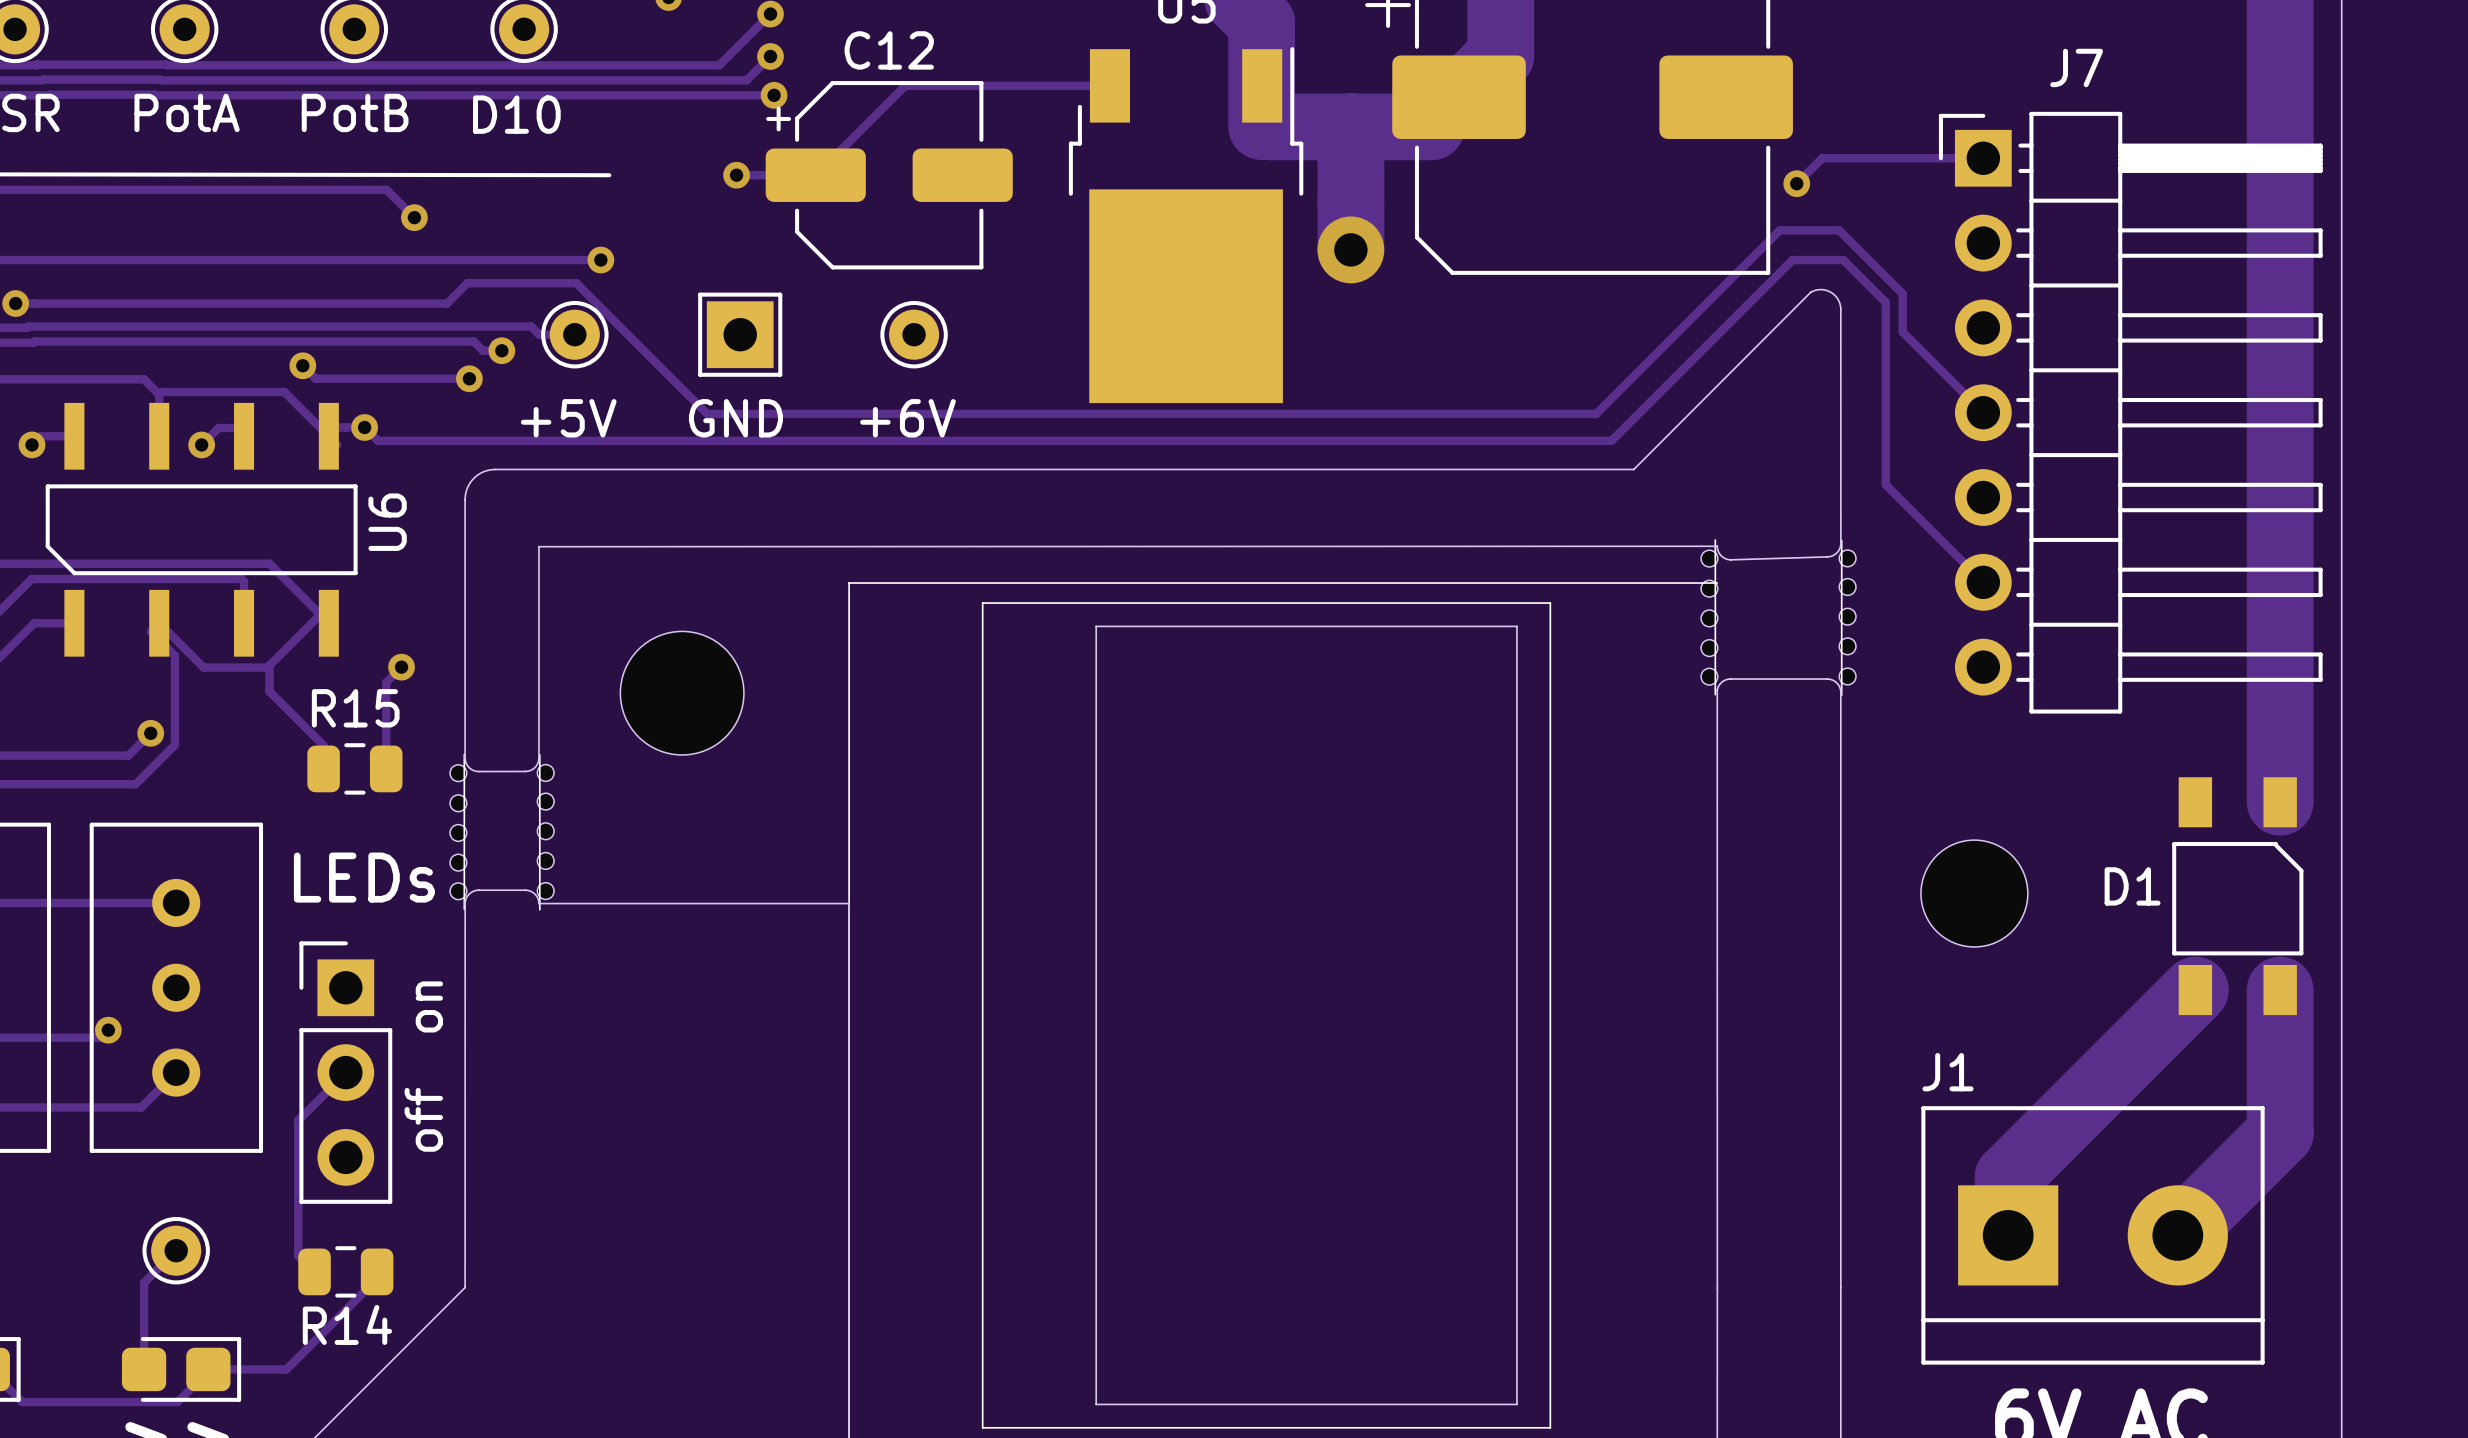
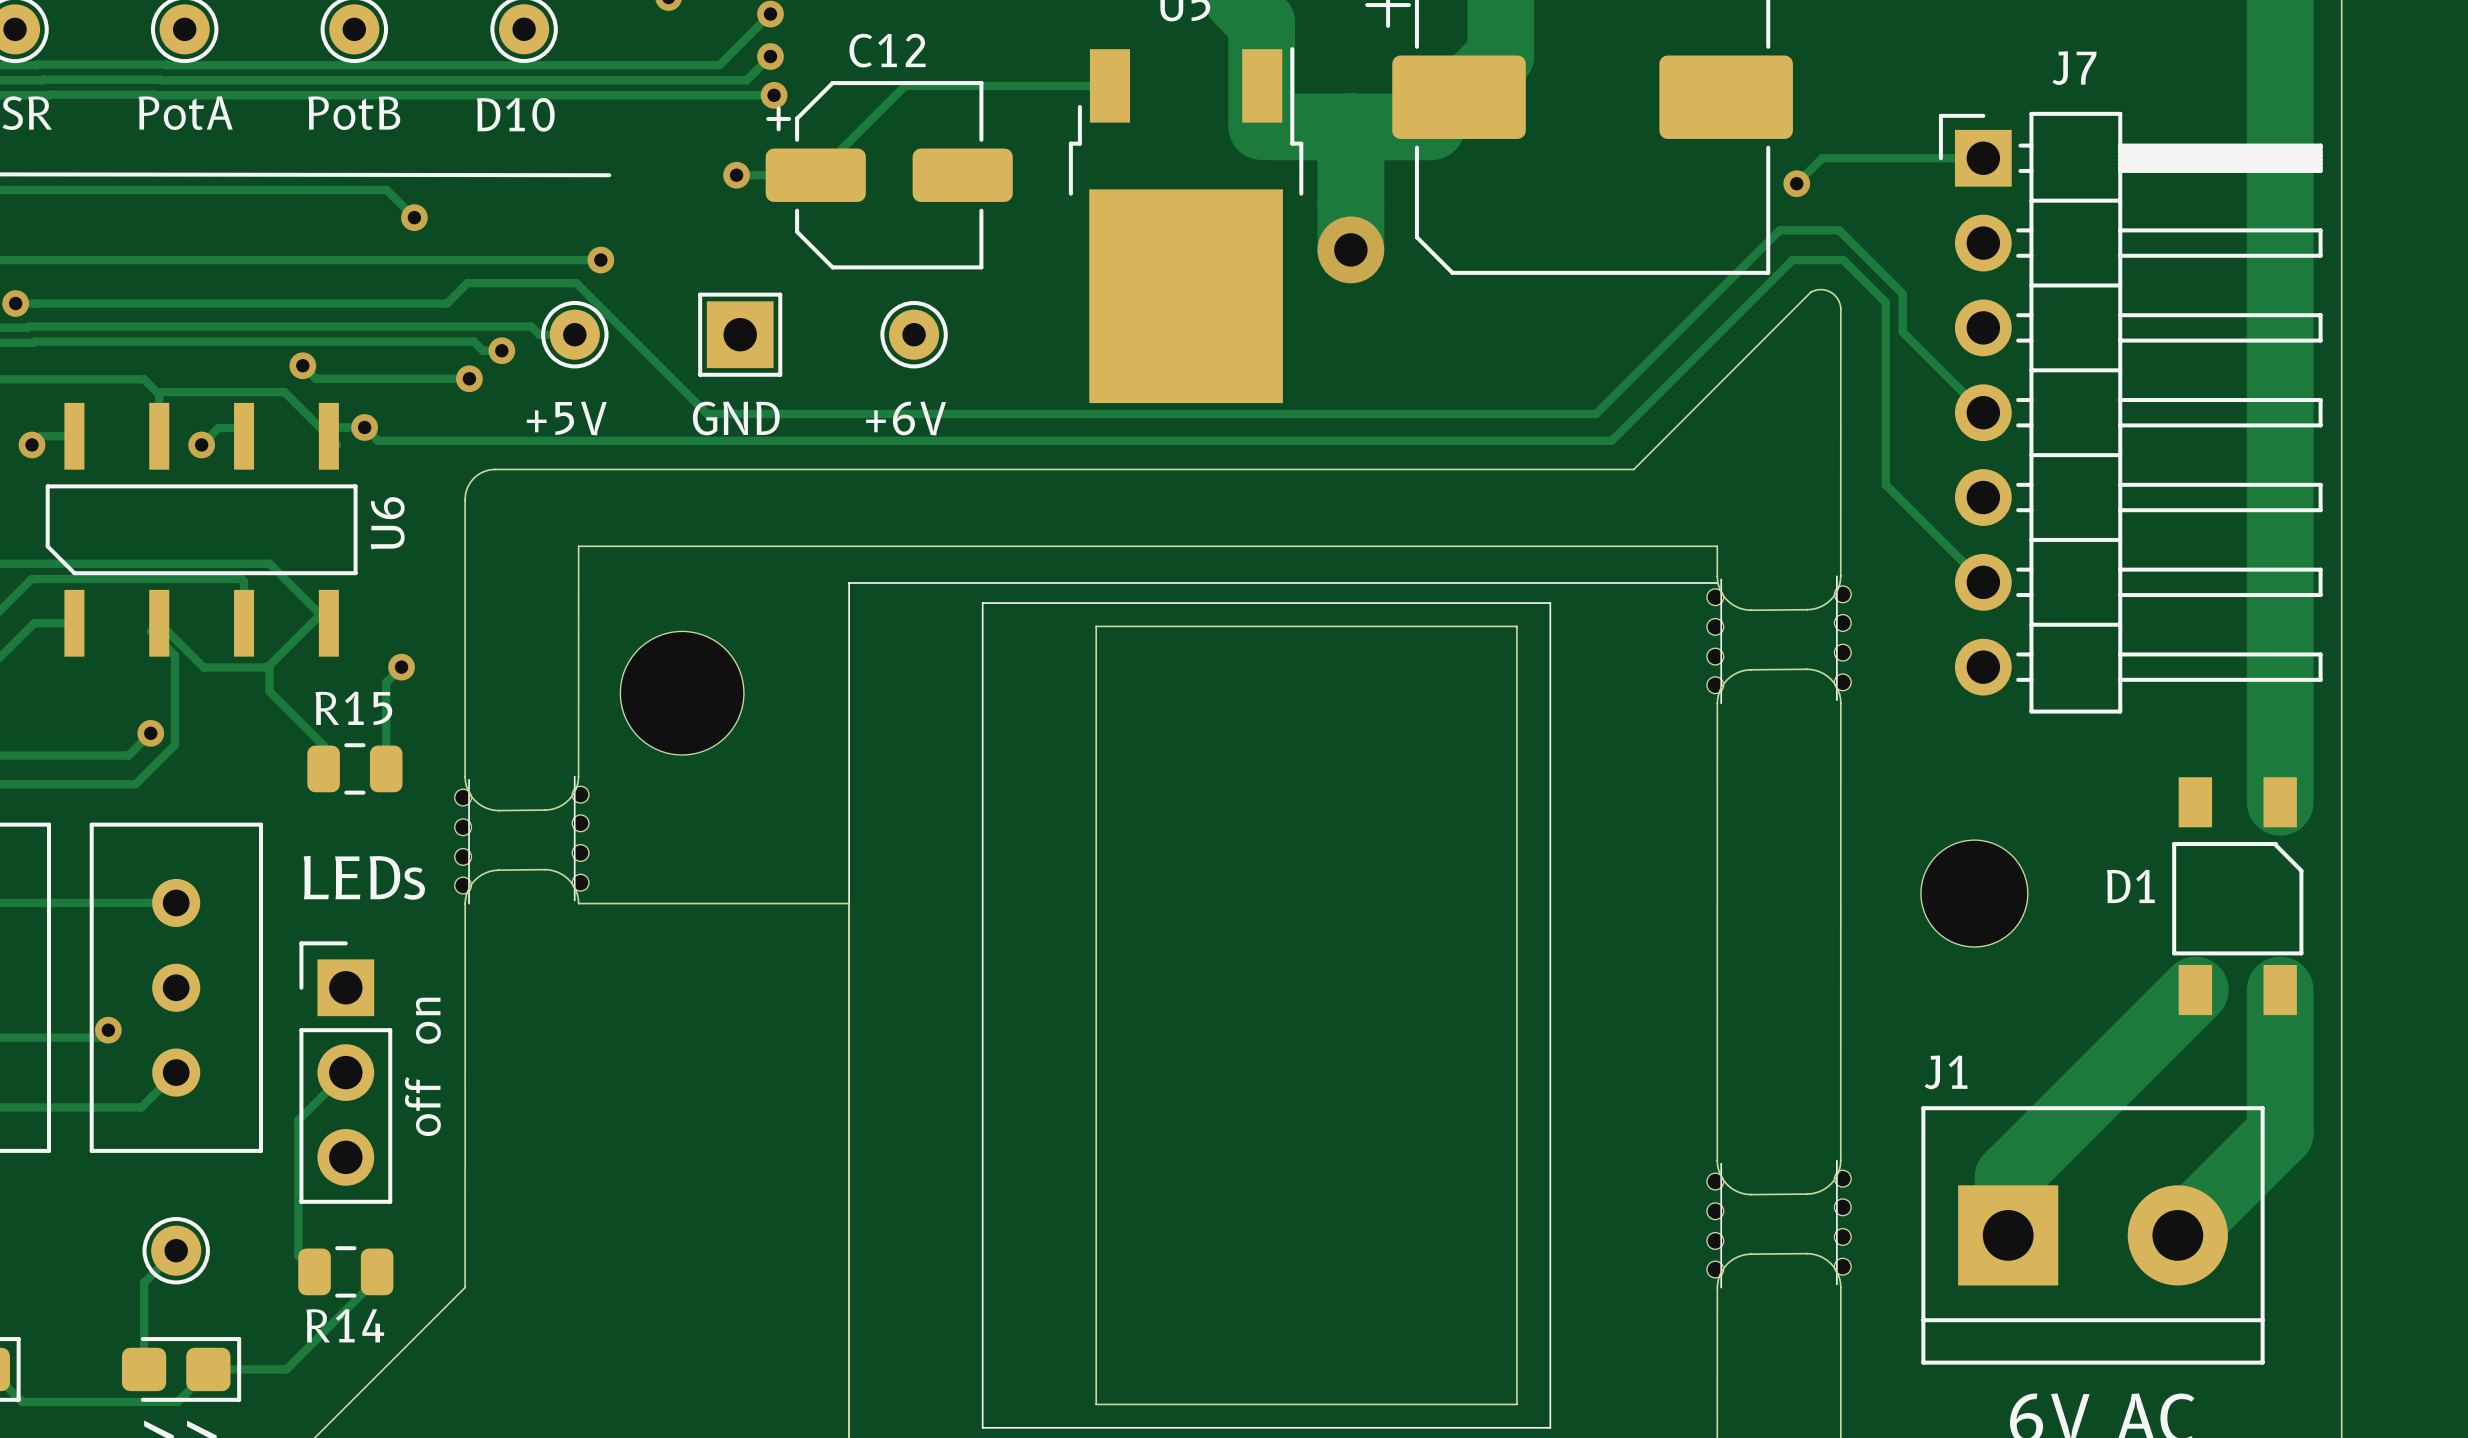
board edge: (1840, 309) (1840, 543) (1838, 551) (1830, 556) (1729, 559) (1720, 554) (1717, 546) (538, 546) (537, 763) (533, 768) (527, 771) (476, 771) (467, 766) (465, 757) -> (1840, 309) (1840, 580) (1838, 588) (1831, 599) (1816, 608) (1751, 610) (1734, 605) (1724, 596) (1718, 585) (1717, 546) (578, 546) (578, 776) (574, 792) (565, 802) (549, 809) (490, 809) (478, 803) (467, 789) (465, 781) (465, 757)
part footprint: [1701, 539, 1718, 696] -> [1706, 578, 1724, 705]
part footprint: [1839, 539, 1856, 696] -> [1834, 575, 1852, 701]
board edge: none -> (1806, 669) (1742, 671) (1727, 679) (1719, 690) (1717, 699) (1717, 1160) (1718, 1169) (1724, 1181) (1734, 1190) (1746, 1194) (1816, 1192) (1831, 1183) (1838, 1173) (1840, 1164) (1840, 698) (1836, 686) (1827, 676) (1819, 671) (1806, 669)
part footprint: [450, 753, 467, 911] -> [454, 778, 472, 905]
part: (545, 832) -> none
part: none -> (580, 838)
board edge: (578, 903) (538, 903) (536, 895) (527, 890) (478, 890) (469, 894) (465, 903) -> (578, 903) (576, 890) (568, 879) (557, 872) (544, 869) (498, 870) (485, 872) (474, 880) (469, 887) (465, 904)
part: none -> (1842, 1222)
part: none -> (1715, 1225)
board edge: (1840, 1287) (1840, 690) (1836, 683) (1829, 679) (1730, 679) (1721, 682) (1717, 690) (1717, 1288) -> (1840, 1287) (1838, 1274) (1830, 1263) (1819, 1256) (1806, 1253) (1750, 1254) (1737, 1256) (1727, 1264) (1721, 1271) (1717, 1288)

